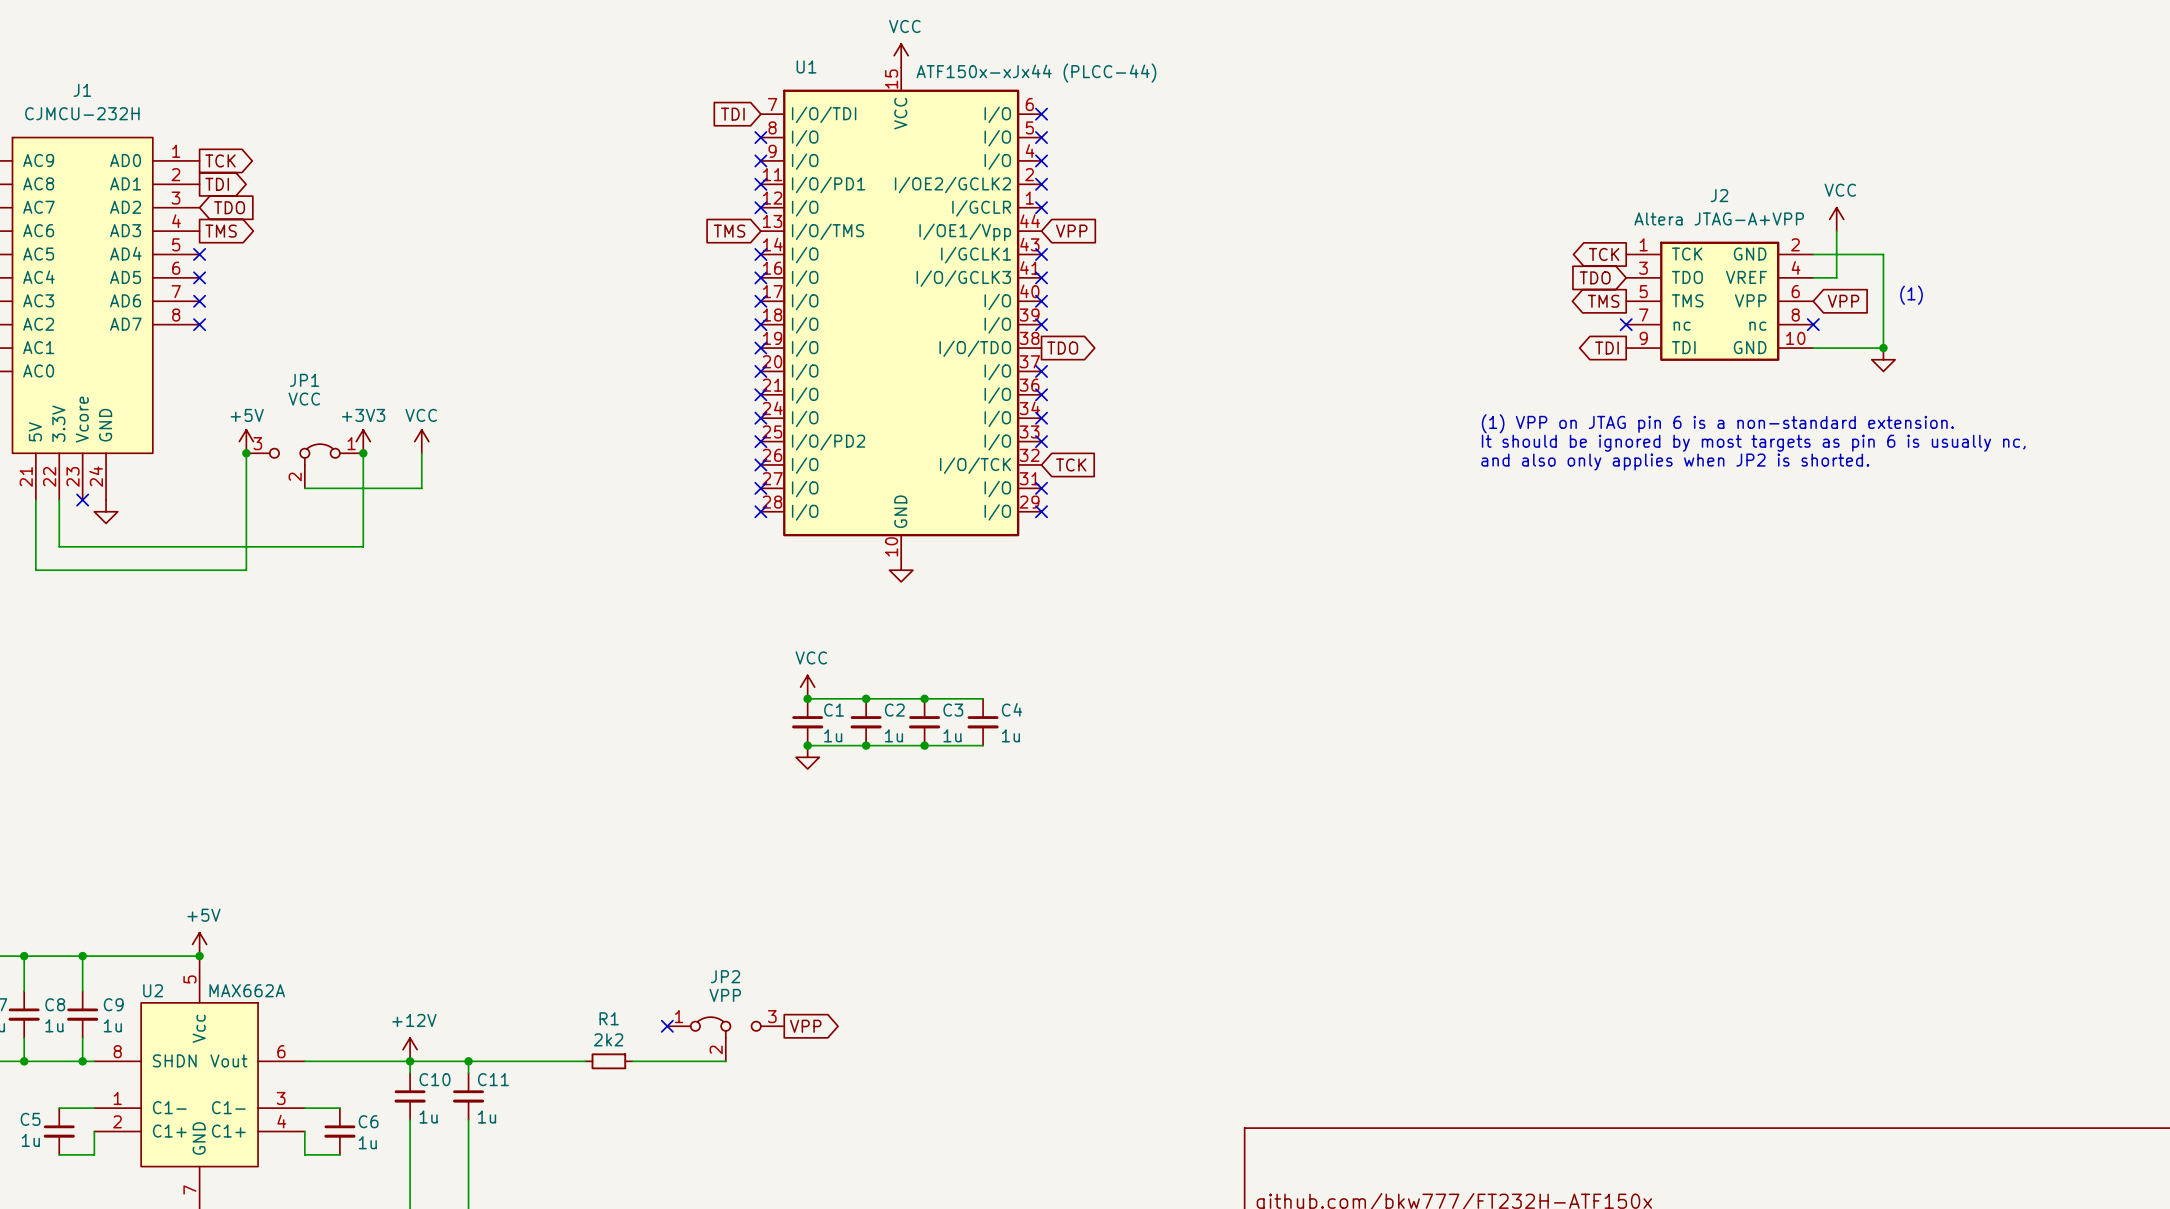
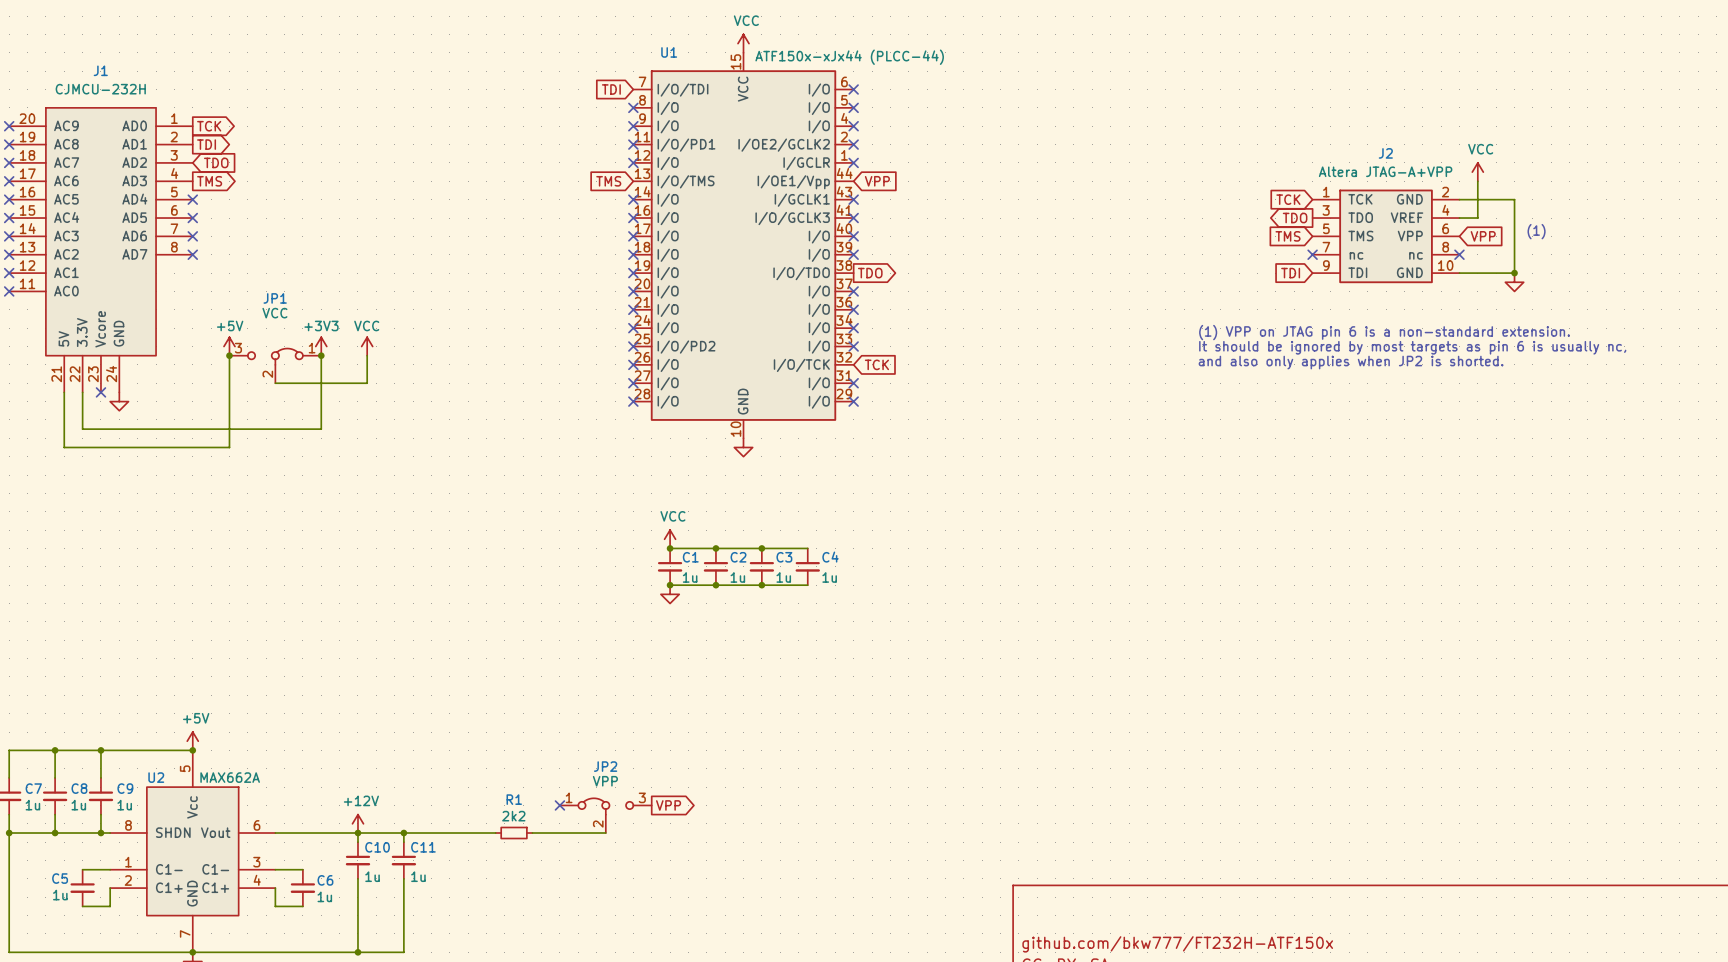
global label shape: output (1604, 254) -> input (1288, 199)
global label shape: input (1595, 277) -> output (1295, 218)
global label shape: output (1603, 301) -> input (1287, 236)
global label shape: output (1606, 348) -> input (1290, 273)

